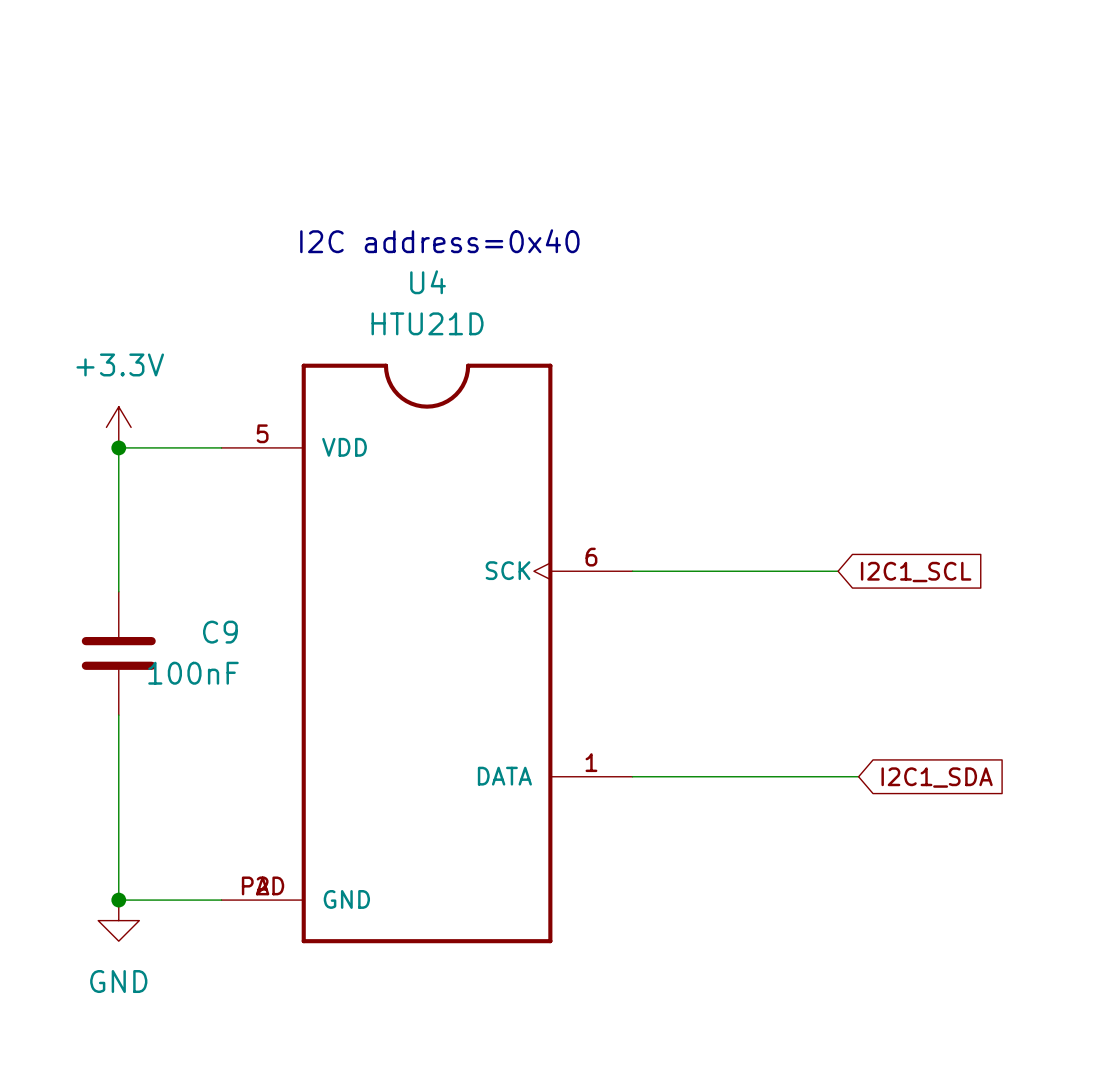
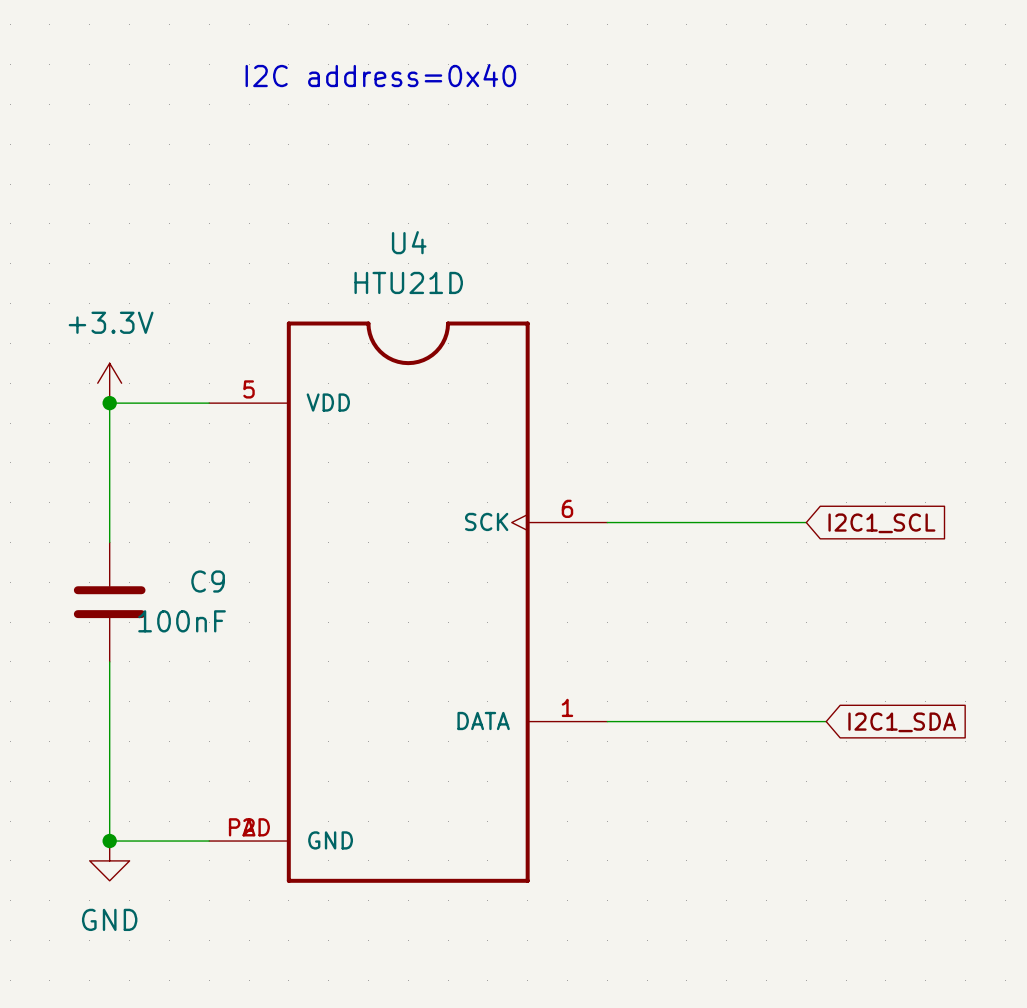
text position: I2C address=0x40 (439, 241) -> I2C address=0x40 (380, 75)

